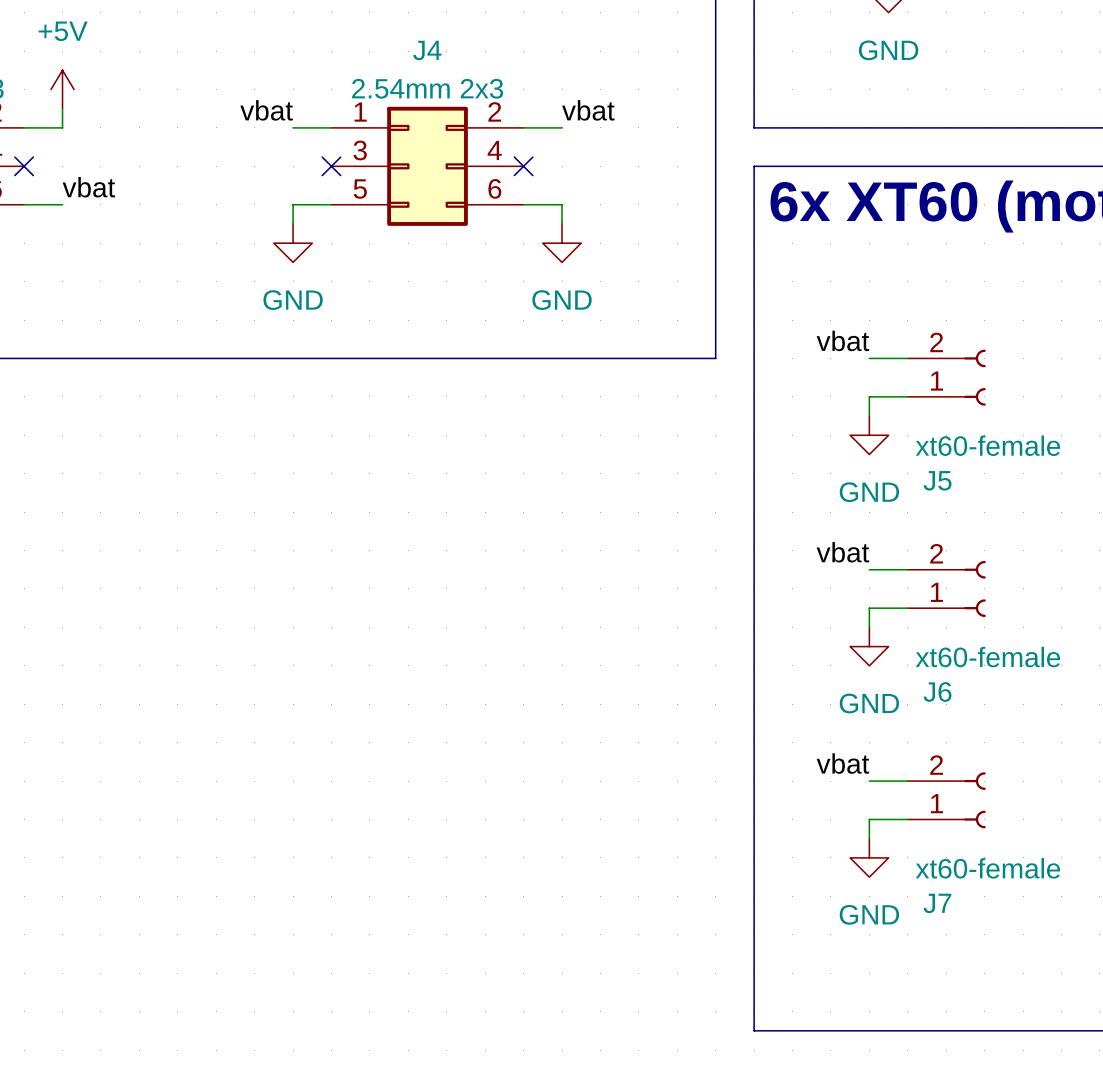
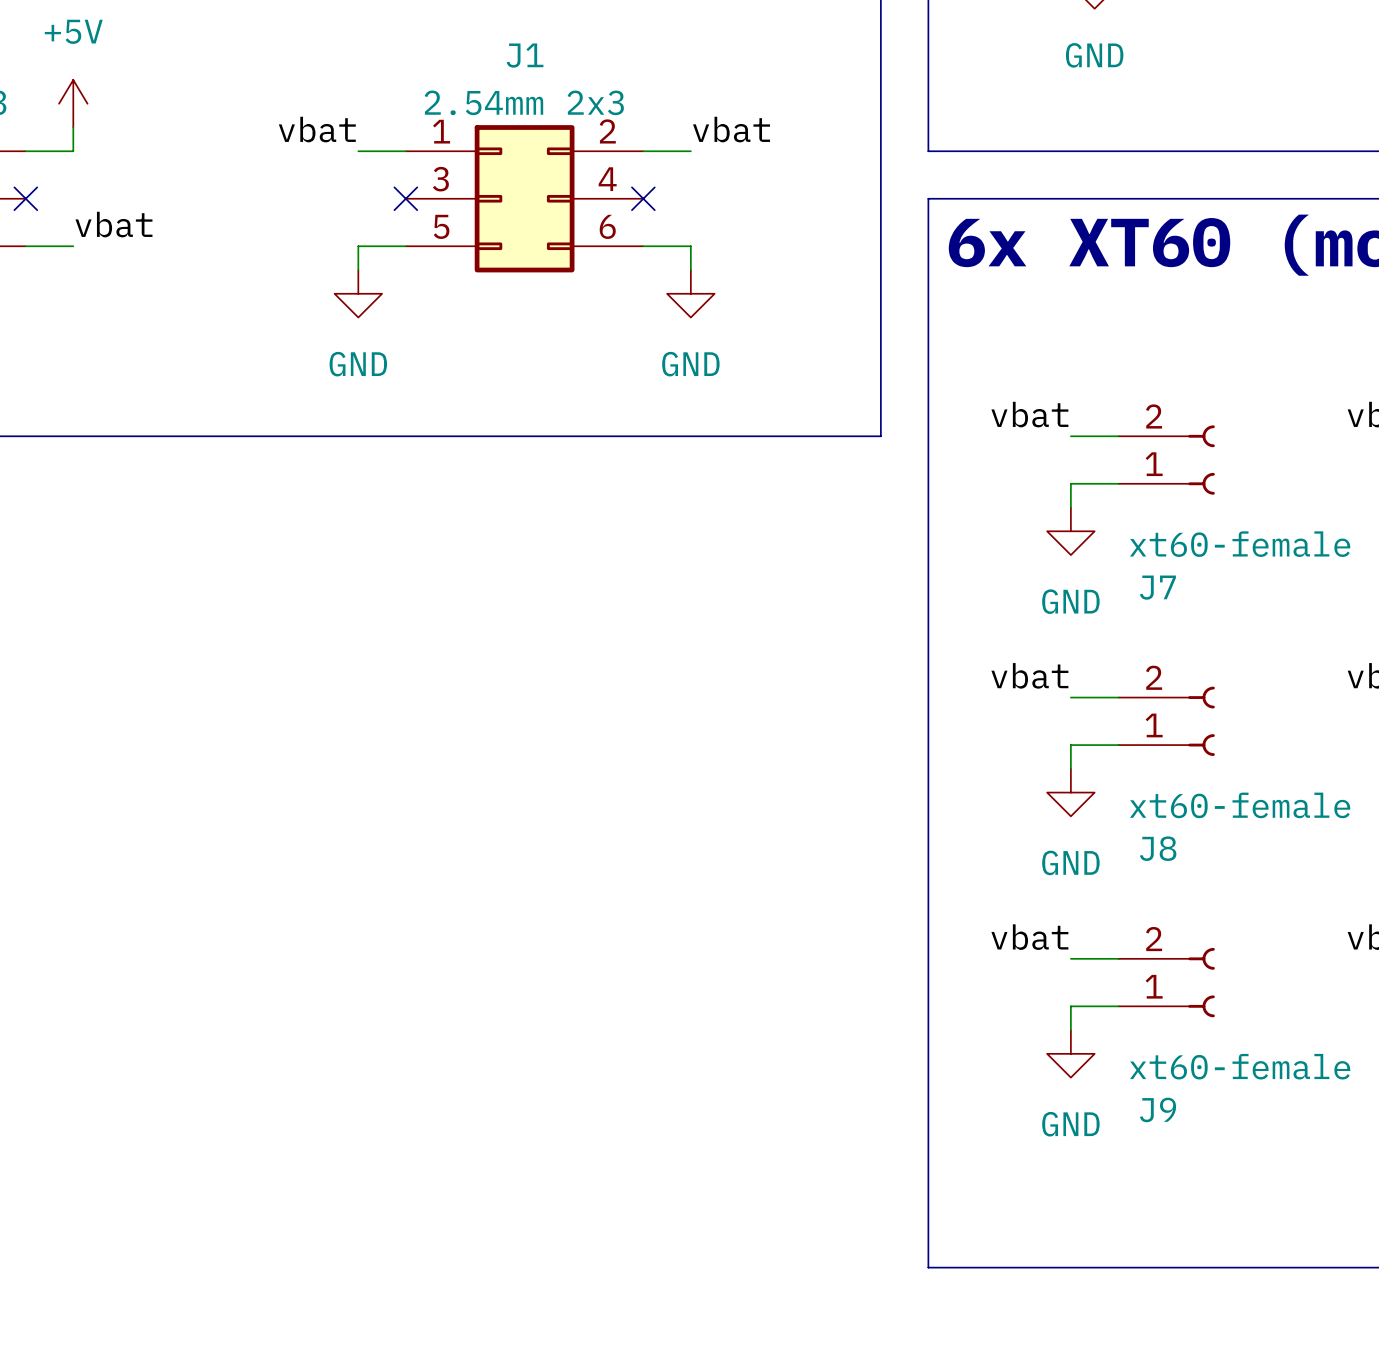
J4 name: J4 (427, 50) -> J1 (525, 55)
J5 name: J5 (937, 480) -> J7 (1157, 587)
J6 name: J6 (937, 691) -> J8 (1158, 848)
J7 name: J7 (937, 903) -> J9 (1157, 1109)

